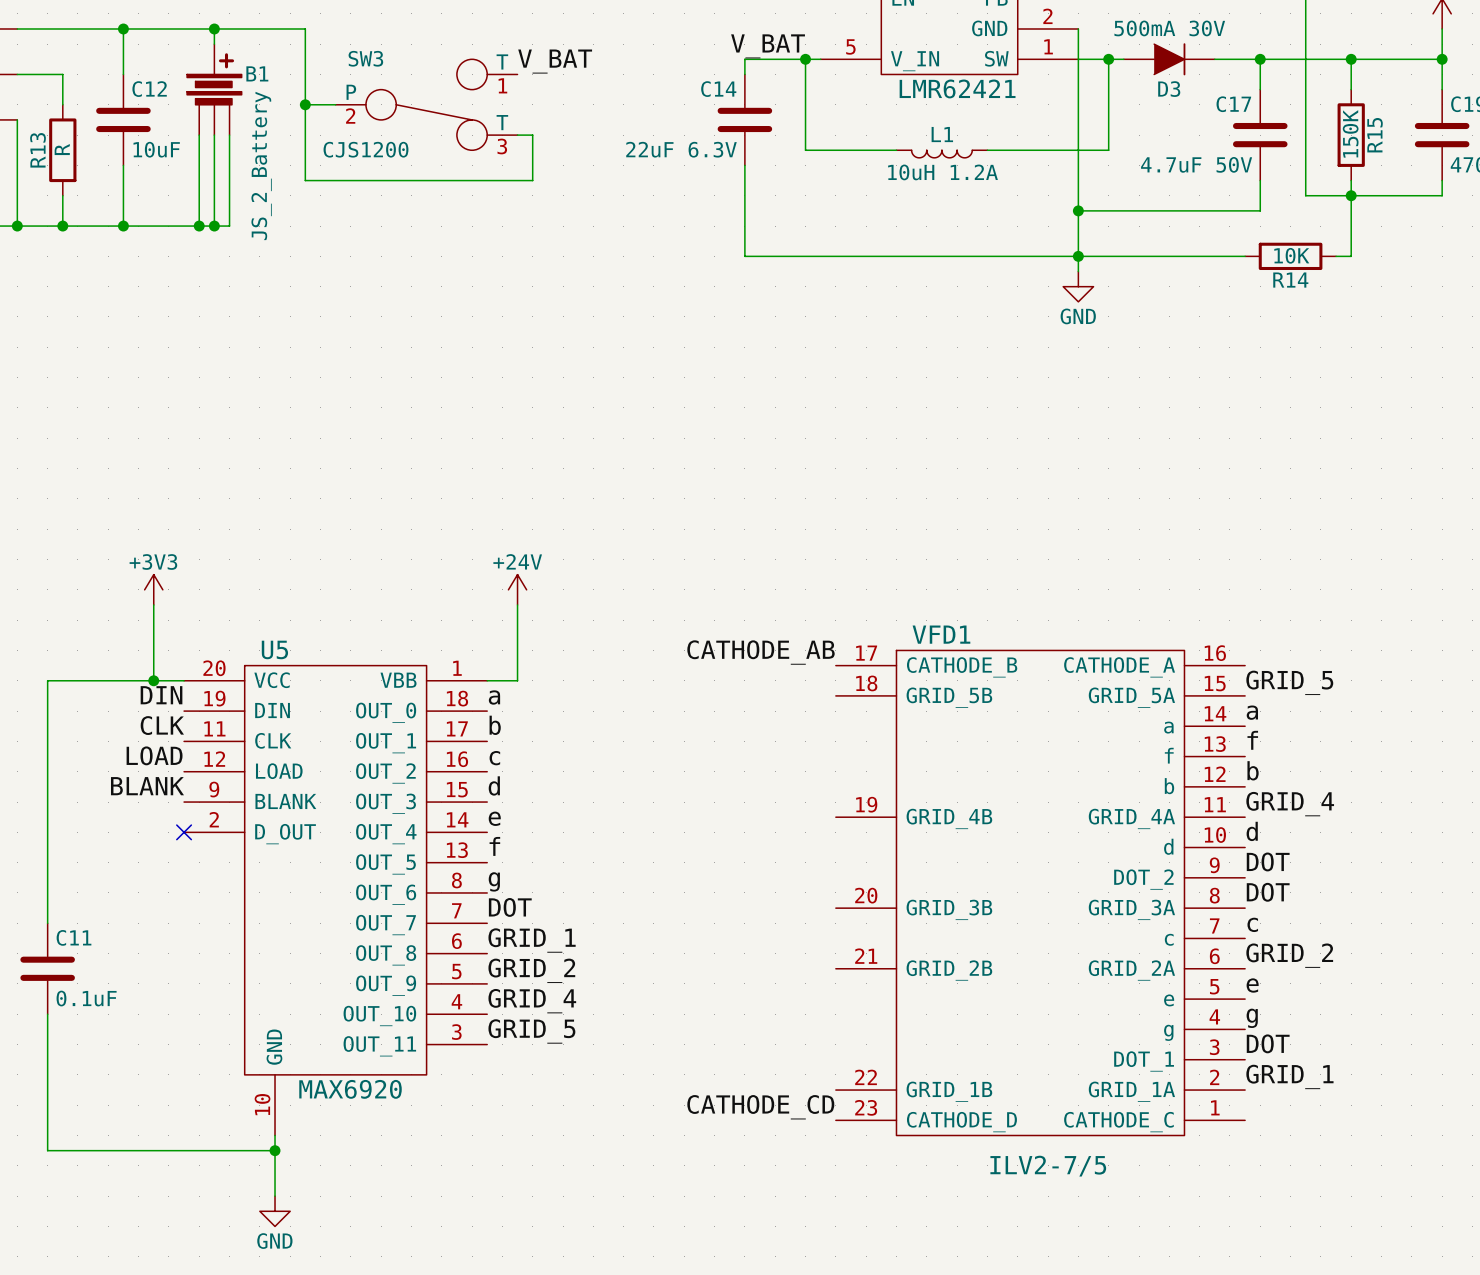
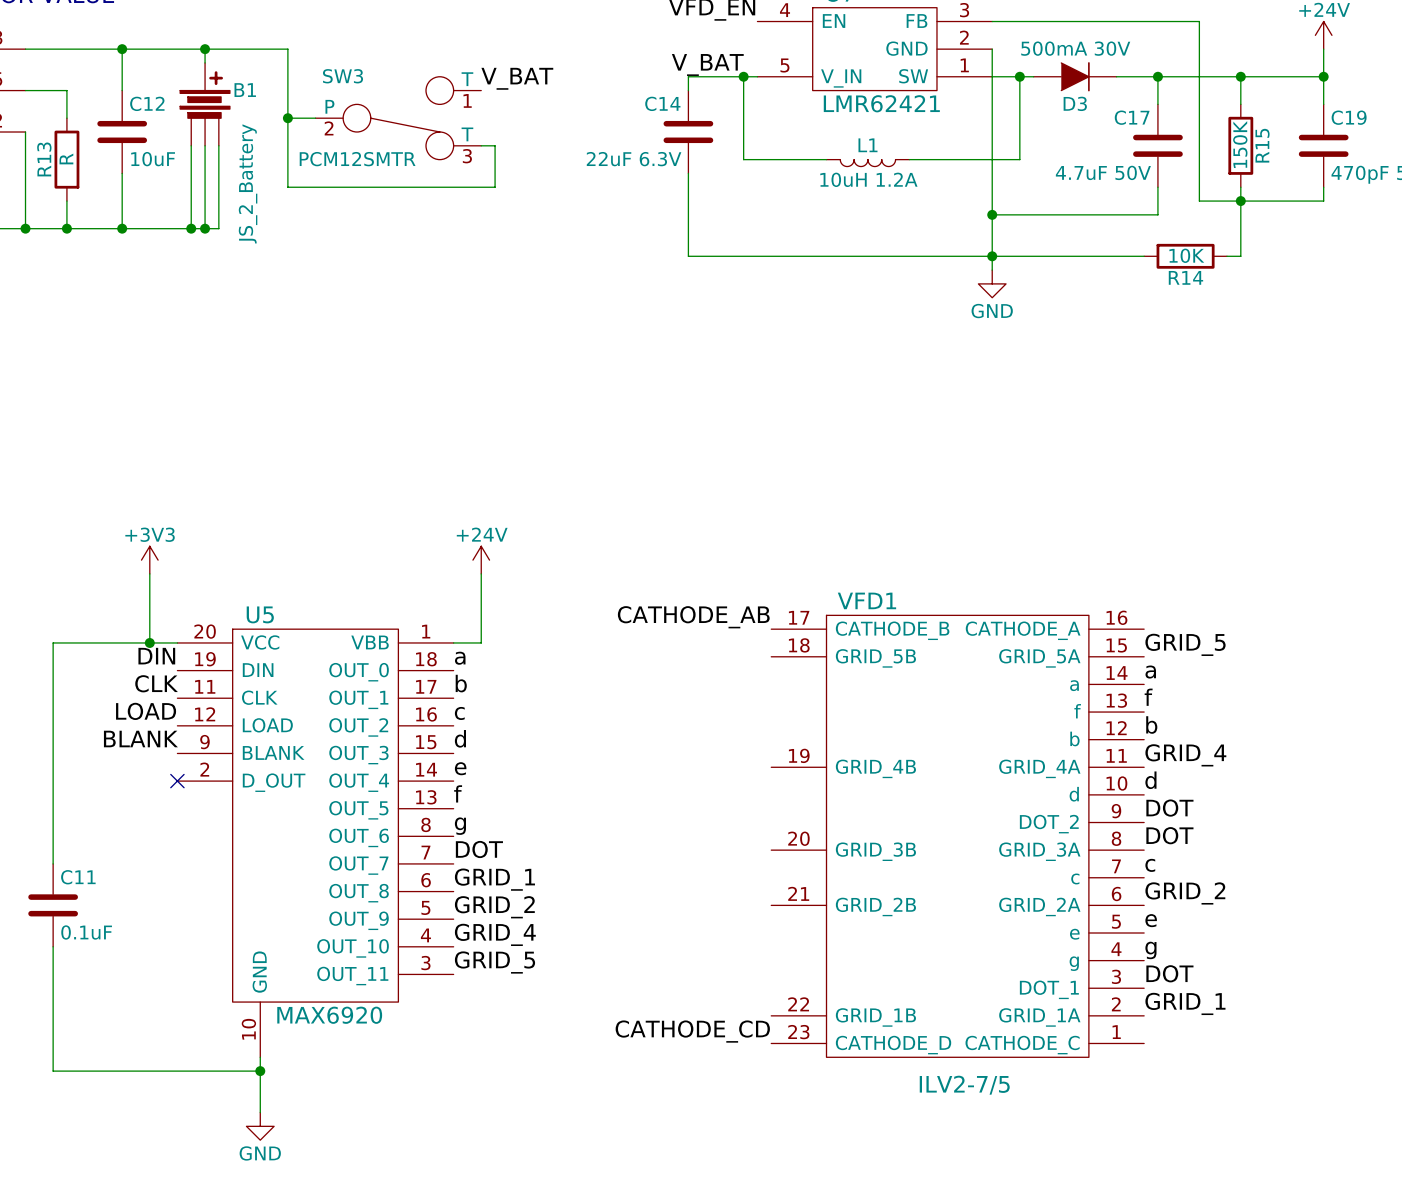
SW3 value: CJS1200 (365, 149) -> PCM12SMTR (357, 159)

